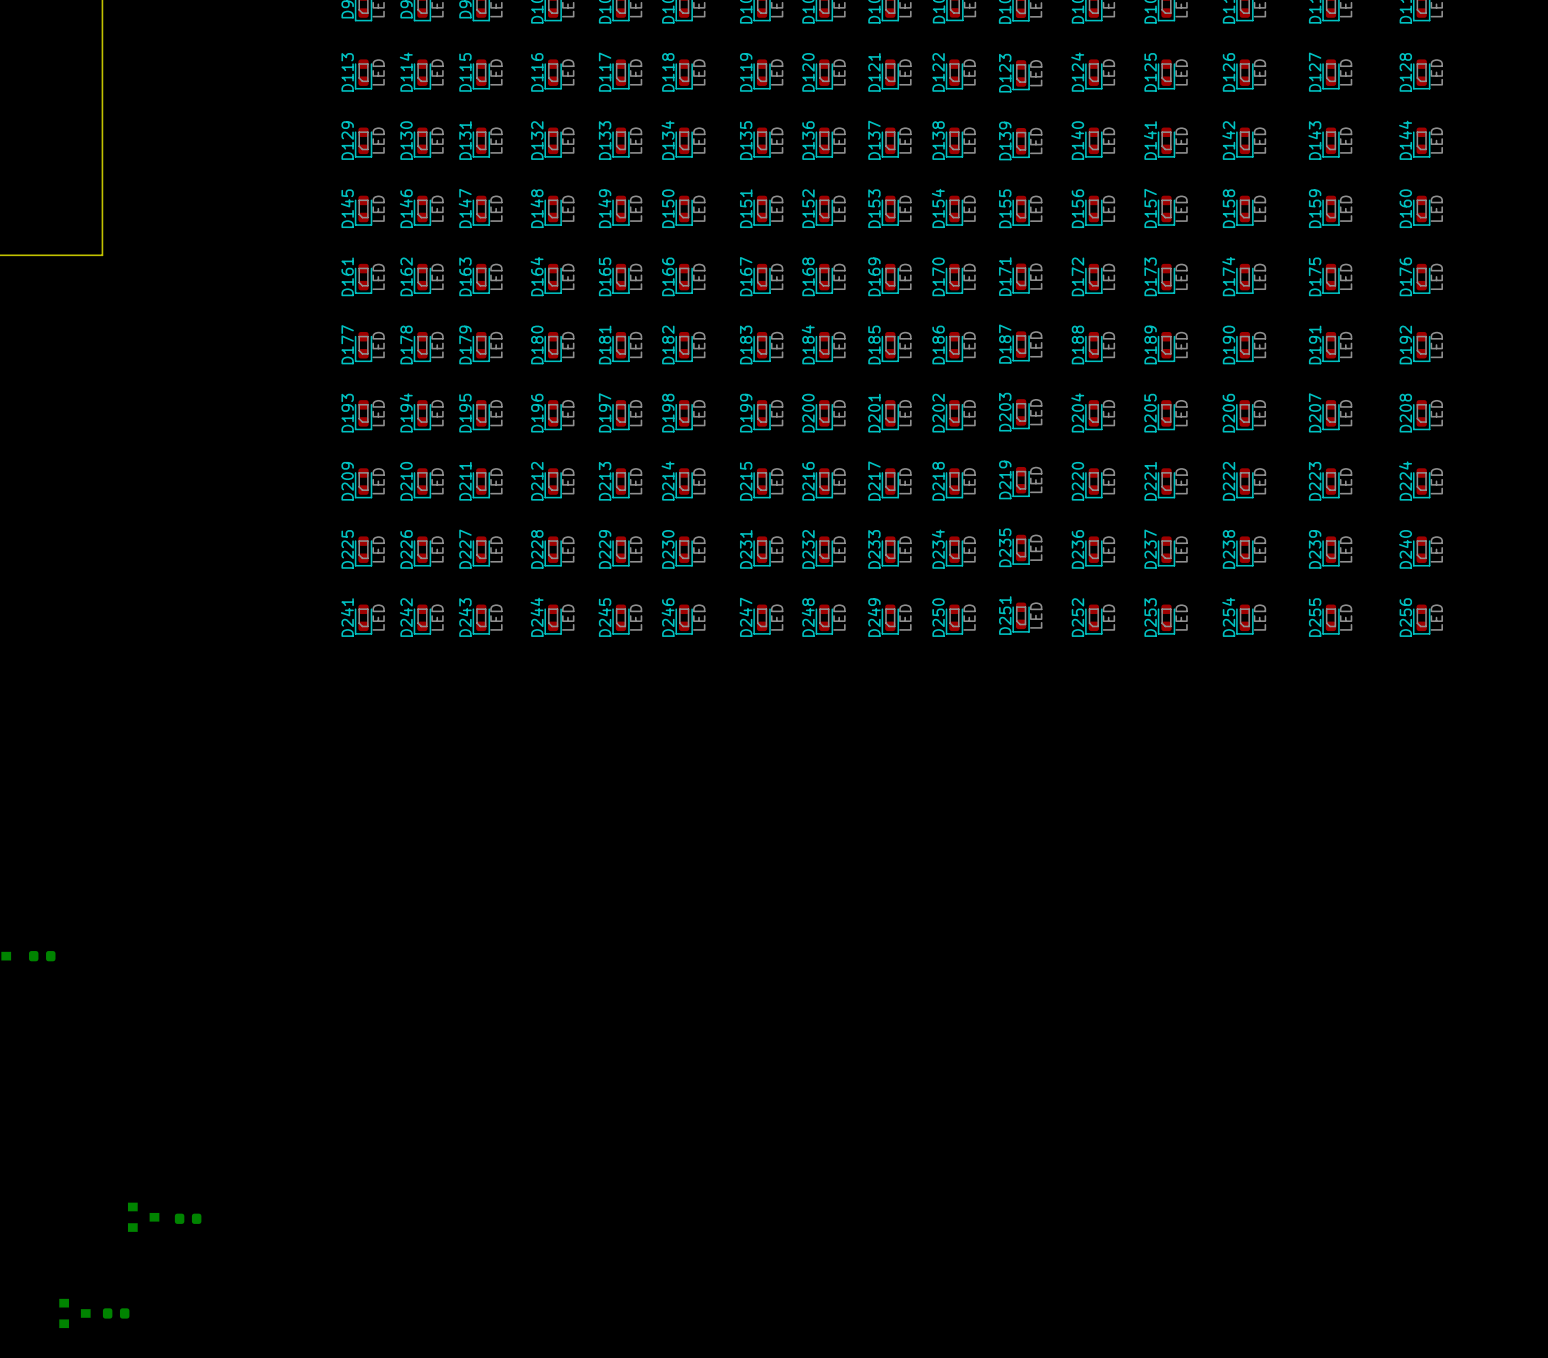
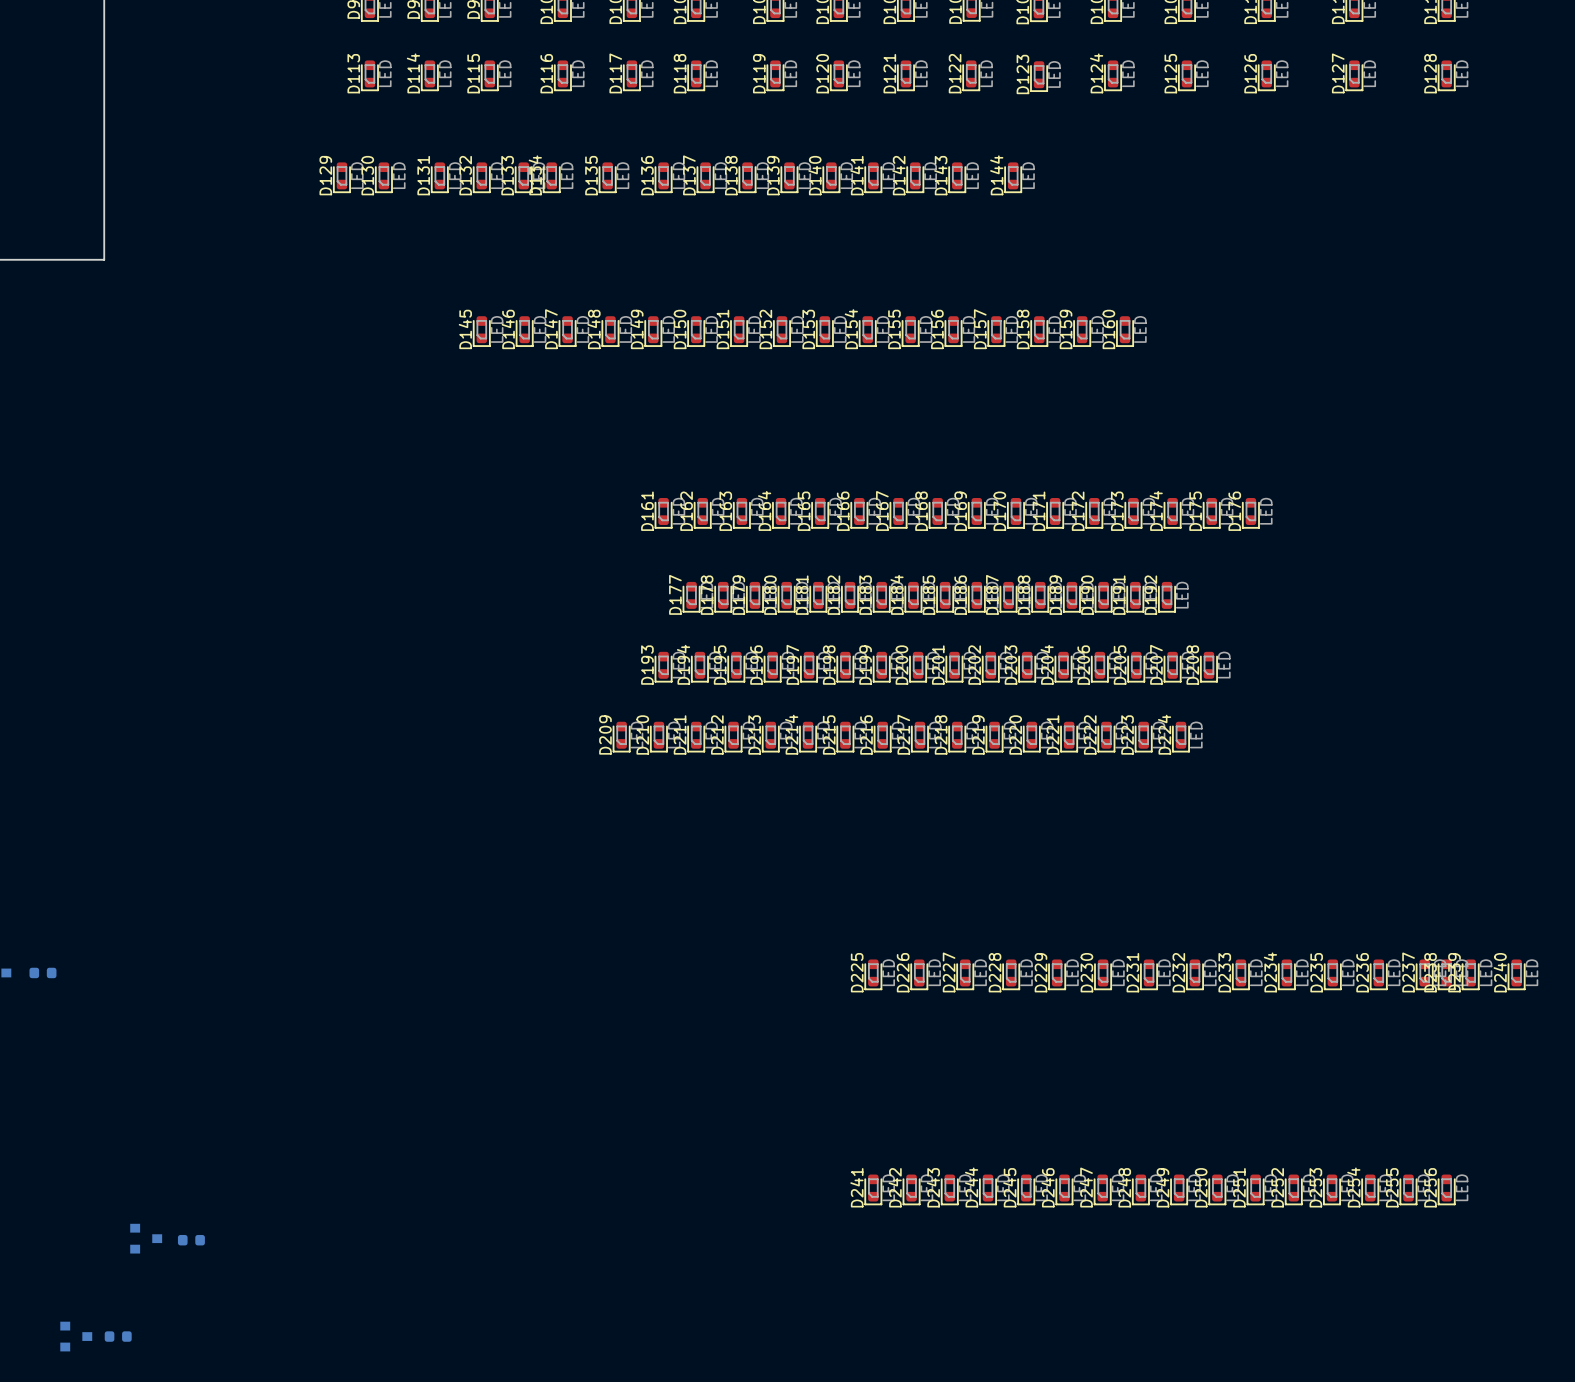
D129 position: (363, 142) -> (341, 177)
D130 position: (422, 142) -> (383, 177)
D131 position: (481, 142) -> (439, 177)
D132 position: (553, 142) -> (481, 177)
D133 position: (620, 142) -> (523, 177)
D134 position: (684, 142) -> (551, 177)
D135 position: (762, 142) -> (607, 177)
D136 position: (824, 142) -> (663, 177)
D137 position: (890, 142) -> (705, 177)
D138 position: (954, 142) -> (747, 177)
D139 position: (1021, 142) -> (789, 177)
D140 position: (1093, 142) -> (831, 177)
D141 position: (1166, 142) -> (873, 177)
D142 position: (1244, 142) -> (915, 177)
D143 position: (1330, 142) -> (957, 177)
D144 position: (1421, 142) -> (1013, 177)
D145 position: (363, 210) -> (481, 331)
D146 position: (422, 210) -> (524, 331)
D147 position: (481, 210) -> (567, 331)
D148 position: (553, 210) -> (610, 331)
D149 position: (620, 210) -> (653, 331)
D150 position: (684, 210) -> (696, 331)
D151 position: (762, 210) -> (739, 331)
D152 position: (824, 210) -> (781, 331)
D153 position: (890, 210) -> (824, 331)
D154 position: (954, 210) -> (867, 331)
D155 position: (1021, 210) -> (910, 331)
D156 position: (1093, 210) -> (953, 331)
D157 position: (1166, 210) -> (996, 331)
D158 position: (1244, 210) -> (1039, 331)
D159 position: (1330, 210) -> (1082, 331)
D160 position: (1421, 210) -> (1125, 331)
D161 position: (363, 278) -> (663, 513)
D162 position: (422, 278) -> (702, 513)
D163 position: (481, 278) -> (741, 513)
D164 position: (553, 278) -> (781, 513)
D165 position: (620, 278) -> (820, 513)
D166 position: (684, 278) -> (859, 513)
D167 position: (762, 278) -> (898, 513)
D168 position: (824, 278) -> (937, 513)
D169 position: (890, 278) -> (976, 513)
D170 position: (954, 278) -> (1015, 513)
D171 position: (1021, 278) -> (1055, 513)
D172 position: (1093, 278) -> (1094, 513)
D173 position: (1166, 278) -> (1133, 513)
D174 position: (1244, 278) -> (1172, 513)
D175 position: (1330, 278) -> (1211, 513)
D176 position: (1421, 278) -> (1250, 513)
D177 position: (363, 346) -> (691, 597)
D178 position: (422, 346) -> (723, 597)
D179 position: (481, 346) -> (754, 597)
D180 position: (553, 346) -> (786, 597)
D181 position: (620, 346) -> (818, 597)
D182 position: (684, 346) -> (850, 597)
D183 position: (762, 346) -> (881, 597)
D184 position: (824, 346) -> (913, 597)
D185 position: (890, 346) -> (945, 597)
D186 position: (954, 346) -> (976, 597)
D187 position: (1021, 346) -> (1008, 597)
D188 position: (1093, 346) -> (1040, 597)
D189 position: (1166, 346) -> (1071, 597)
D190 position: (1244, 346) -> (1103, 597)
D191 position: (1330, 346) -> (1135, 597)
D192 position: (1421, 346) -> (1167, 597)
D203 position: (1021, 414) -> (1027, 667)
D193 position: (363, 415) -> (663, 667)
D194 position: (422, 415) -> (699, 667)
D195 position: (481, 415) -> (736, 667)
D196 position: (553, 415) -> (772, 667)
D197 position: (620, 415) -> (809, 667)
D198 position: (684, 415) -> (845, 667)
D199 position: (762, 415) -> (881, 667)
D200 position: (824, 415) -> (918, 667)
D201 position: (890, 415) -> (954, 667)
D202 position: (954, 415) -> (990, 667)
D204 position: (1093, 415) -> (1063, 667)
D205 position: (1166, 415) -> (1136, 667)
D206 position: (1244, 415) -> (1099, 667)
D207 position: (1330, 415) -> (1172, 667)
D208 position: (1421, 415) -> (1208, 667)
D219 position: (1021, 481) -> (994, 737)
D209 position: (363, 483) -> (621, 737)
D210 position: (422, 483) -> (658, 737)
D211 position: (481, 483) -> (696, 737)
D212 position: (553, 483) -> (733, 737)
D213 position: (620, 483) -> (770, 737)
D214 position: (684, 483) -> (808, 737)
D215 position: (762, 483) -> (845, 737)
D216 position: (824, 483) -> (882, 737)
D217 position: (890, 483) -> (919, 737)
D218 position: (954, 483) -> (957, 737)
D220 position: (1093, 483) -> (1031, 737)
D221 position: (1166, 483) -> (1069, 737)
D222 position: (1244, 483) -> (1106, 737)
D223 position: (1330, 483) -> (1143, 737)
D224 position: (1421, 483) -> (1180, 737)
D235 position: (1021, 549) -> (1332, 974)
D225 position: (363, 551) -> (873, 974)
D226 position: (422, 551) -> (919, 974)
D227 position: (481, 551) -> (965, 974)
D228 position: (553, 551) -> (1011, 974)
D229 position: (620, 551) -> (1057, 974)
D230 position: (684, 551) -> (1103, 974)
D231 position: (762, 551) -> (1149, 974)
D232 position: (824, 551) -> (1194, 974)
D233 position: (890, 551) -> (1240, 974)
D234 position: (954, 551) -> (1286, 974)
D236 position: (1093, 551) -> (1378, 974)
D237 position: (1166, 551) -> (1424, 974)
D238 position: (1244, 551) -> (1446, 974)
D239 position: (1330, 551) -> (1470, 974)
D240 position: (1421, 551) -> (1516, 974)
D251 position: (1021, 617) -> (1255, 1189)
D241 position: (363, 619) -> (873, 1189)
D242 position: (422, 619) -> (911, 1189)
D243 position: (481, 619) -> (949, 1189)
D244 position: (553, 619) -> (988, 1189)
D245 position: (620, 619) -> (1026, 1189)
D246 position: (684, 619) -> (1064, 1189)
D247 position: (762, 619) -> (1102, 1189)
D248 position: (824, 619) -> (1140, 1189)
D249 position: (890, 619) -> (1179, 1189)
D250 position: (954, 619) -> (1217, 1189)
D252 position: (1093, 619) -> (1293, 1189)
D253 position: (1166, 619) -> (1332, 1189)
D254 position: (1244, 619) -> (1370, 1189)
D255 position: (1330, 619) -> (1408, 1189)
D256 position: (1421, 619) -> (1446, 1189)

